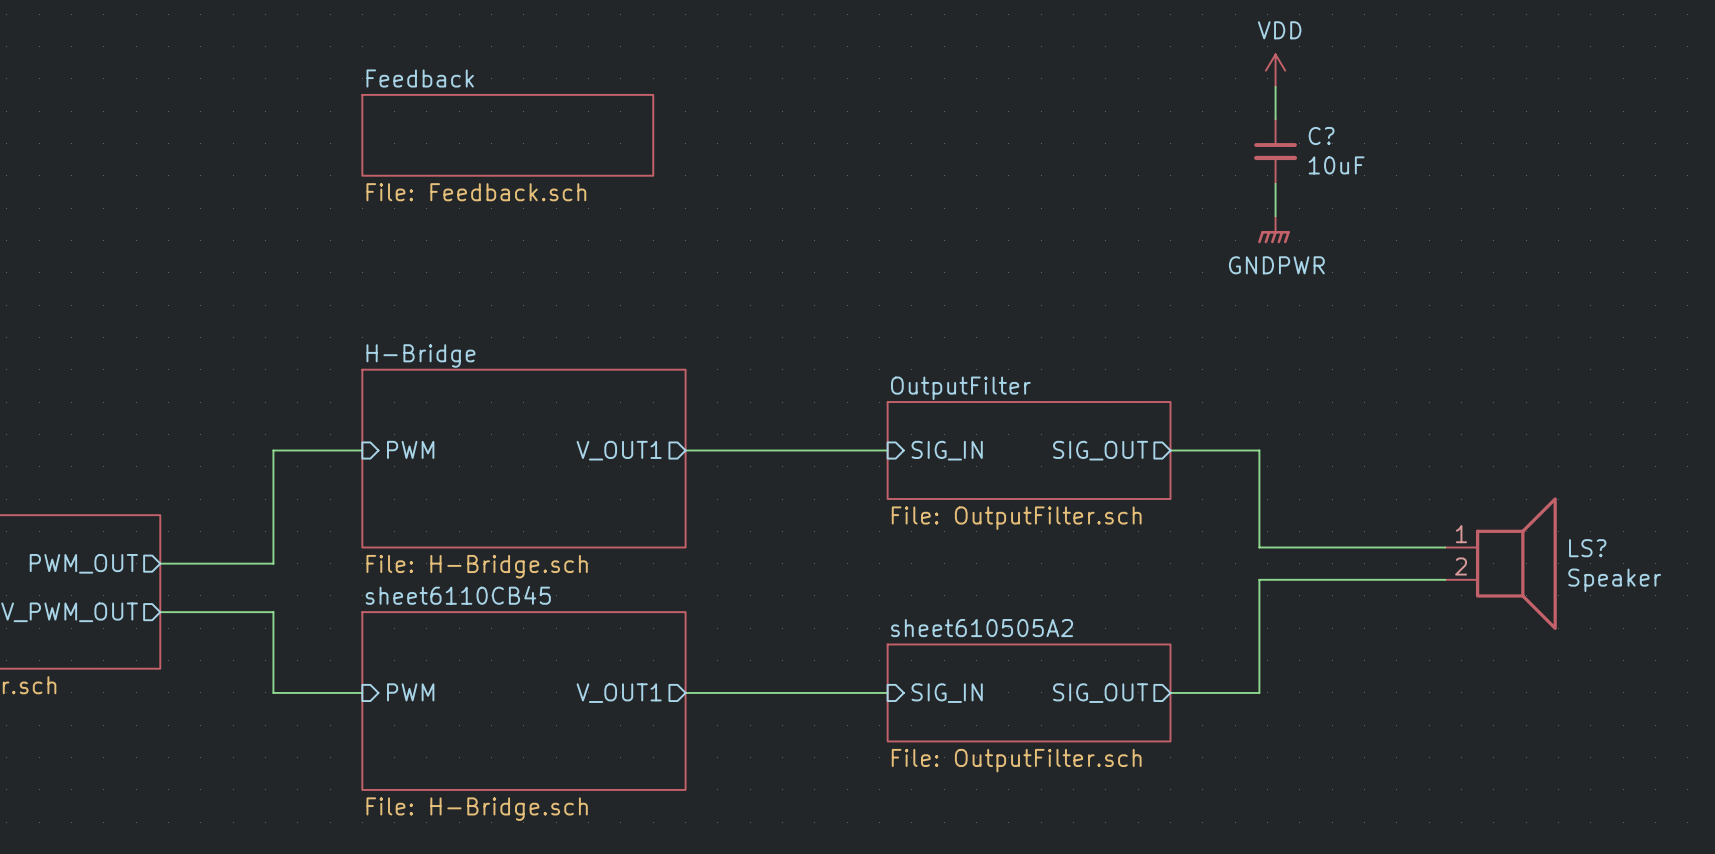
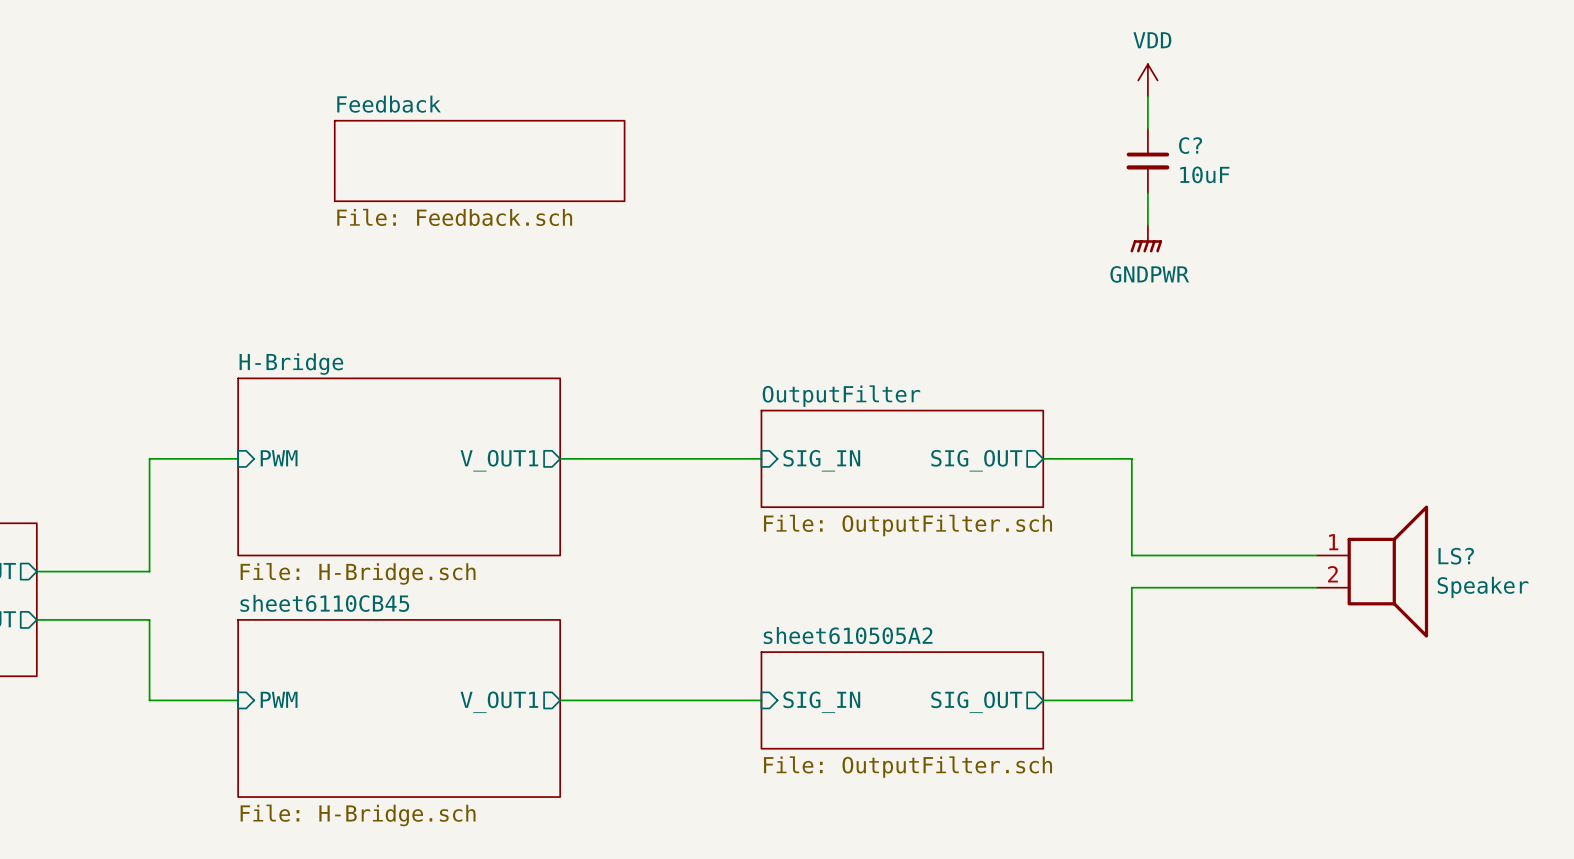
sheet Feedback position: (507, 135) -> (479, 160)

